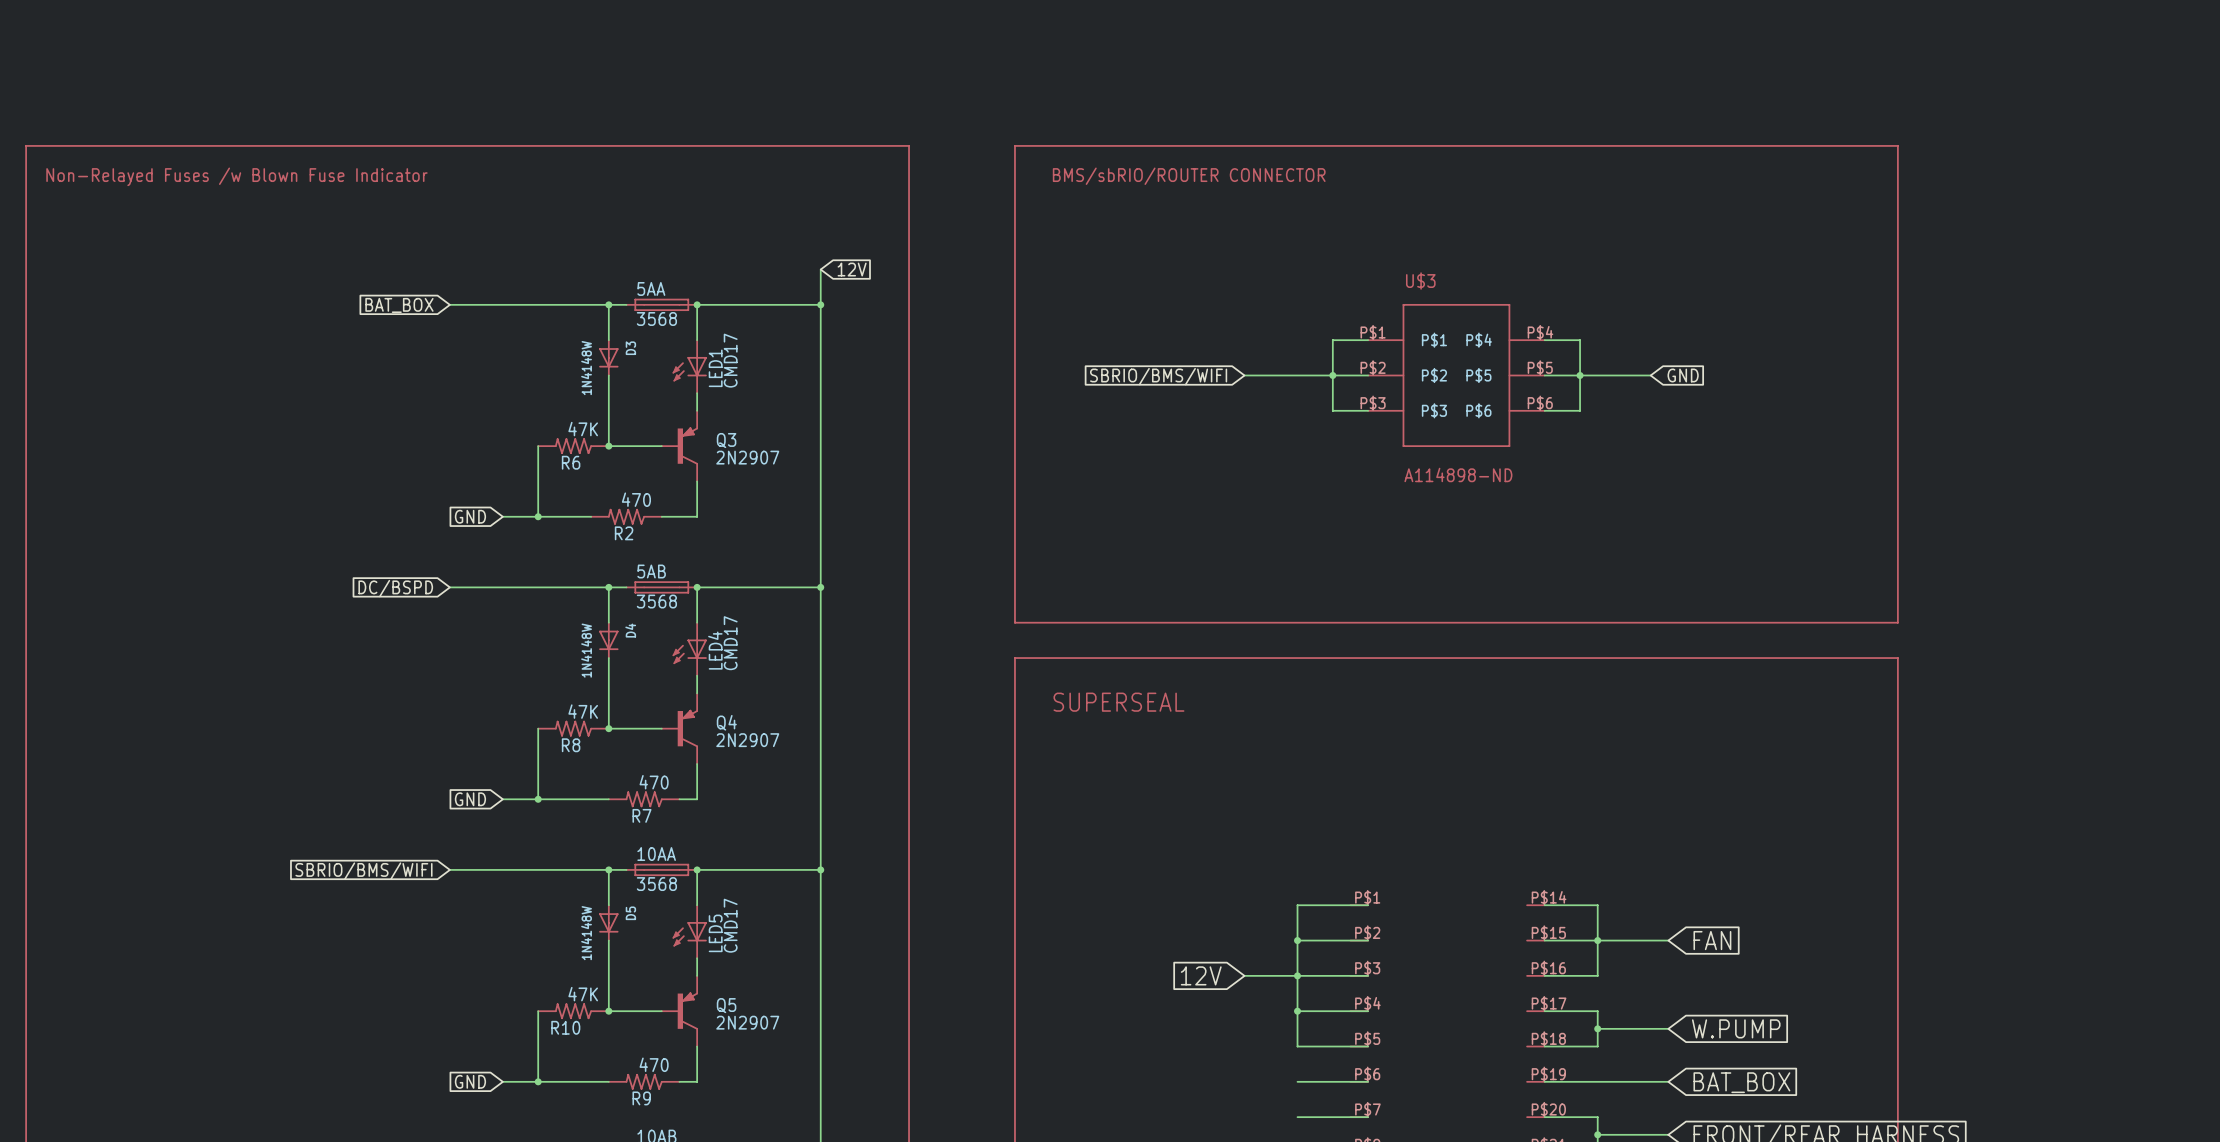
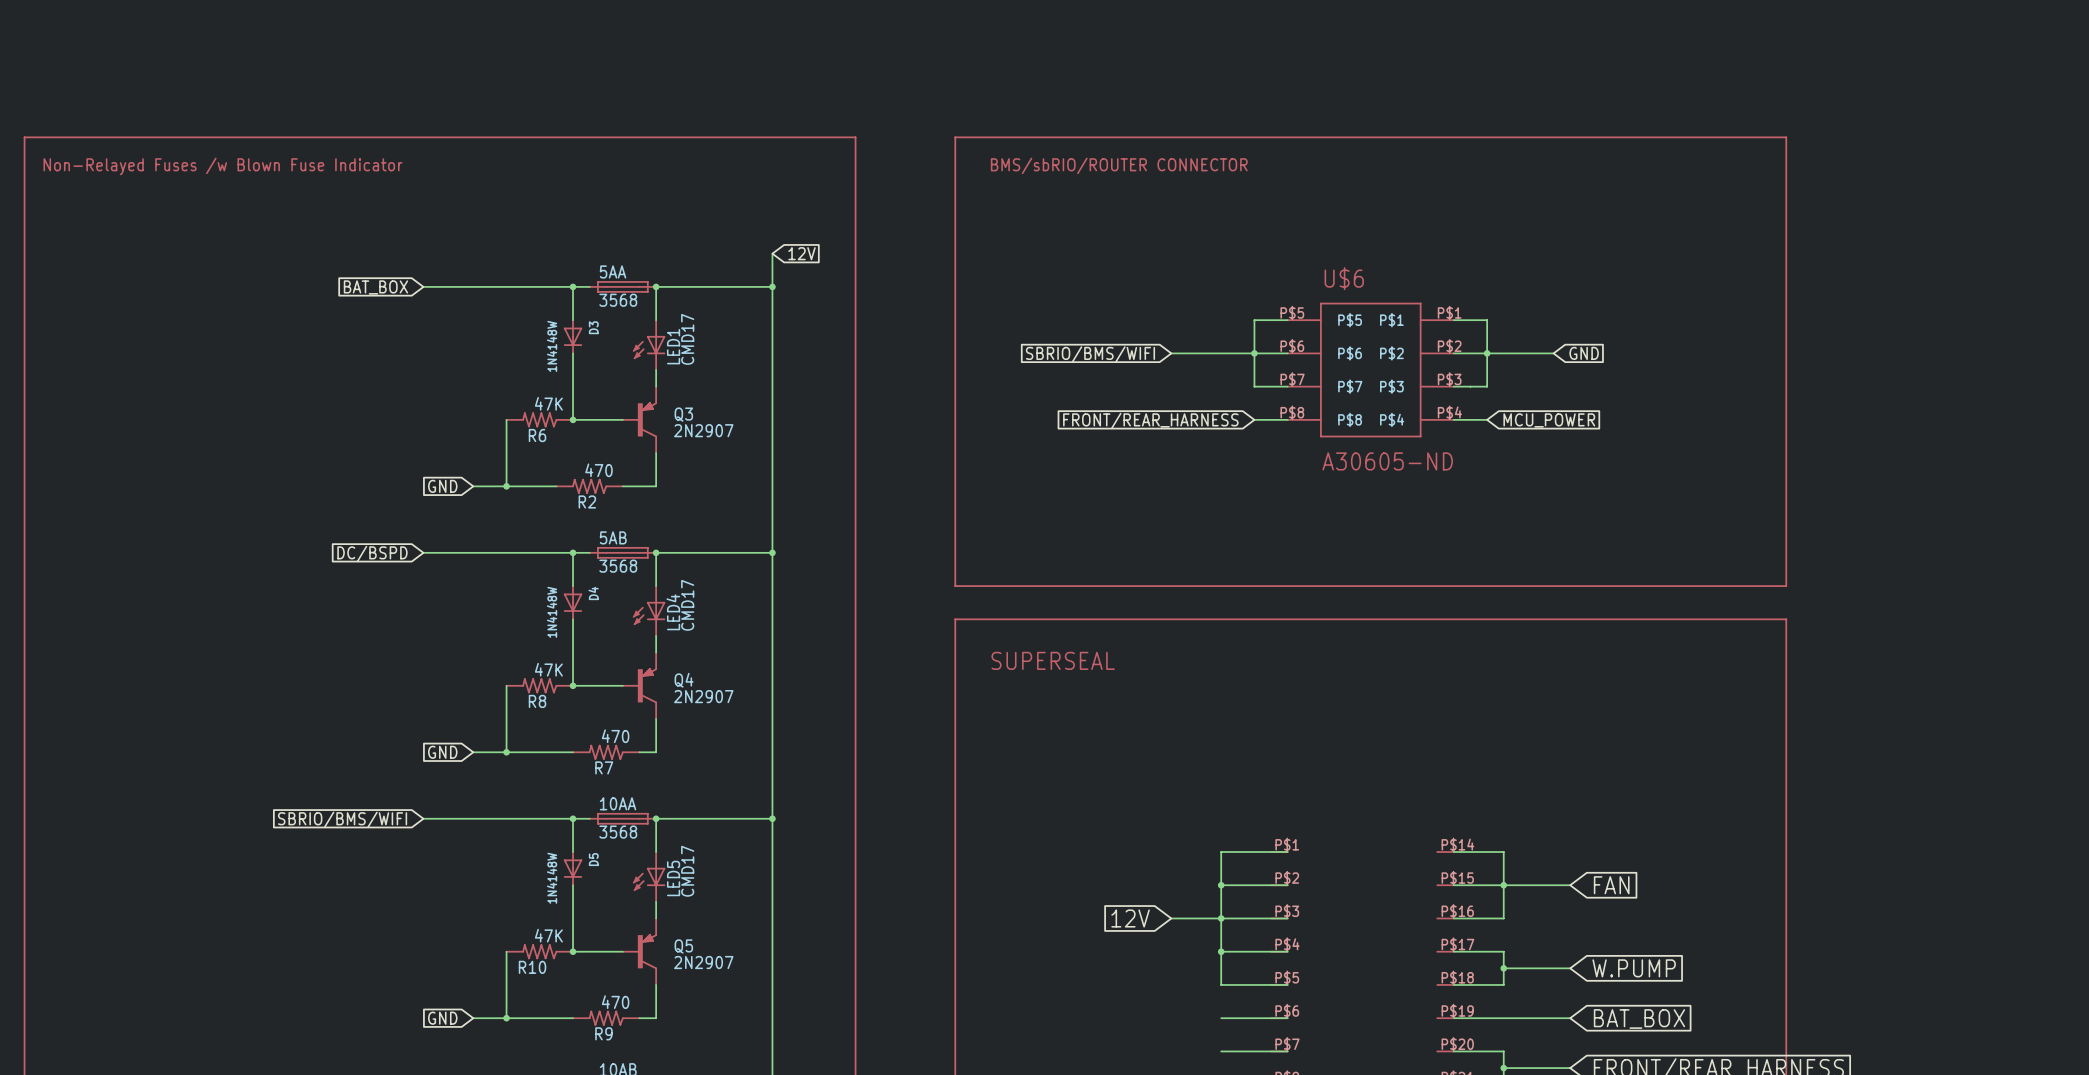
U$3: A114898-ND (1456, 375) -> none
U$6: none -> A30605-ND (1370, 370)
wire: none -> (1254, 419) (1287, 419)
wire: none -> (1453, 419) (1487, 419)
global label: none -> MCU_POWER (1549, 420)
global label: none -> FRONT/REAR_HARNESS (1150, 420)

